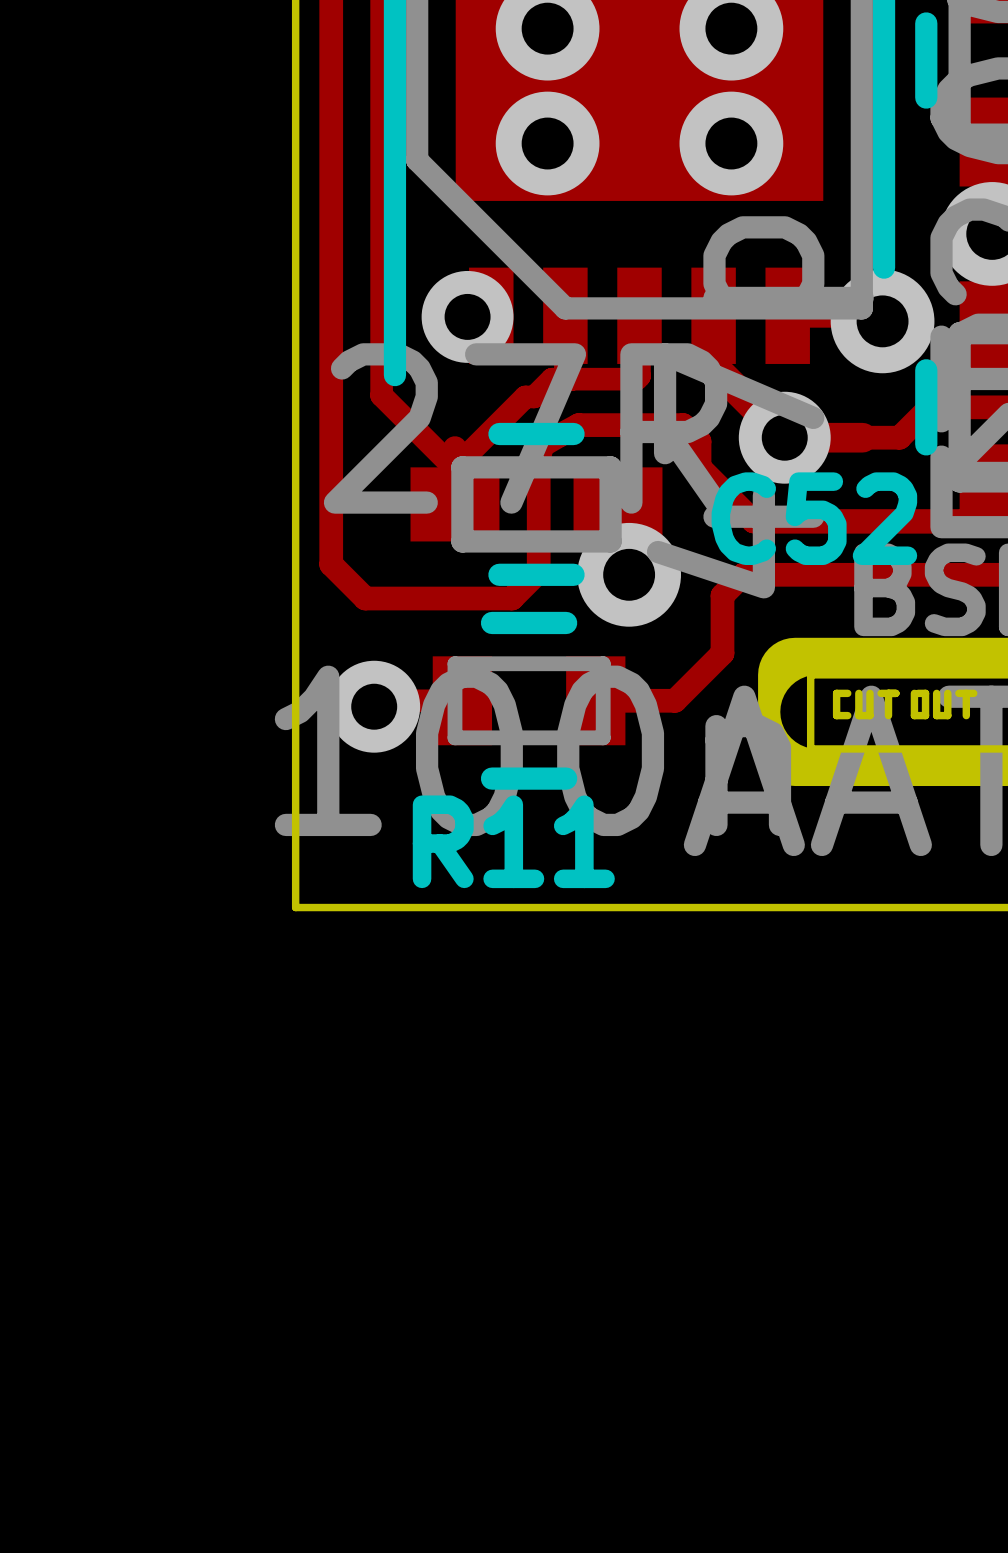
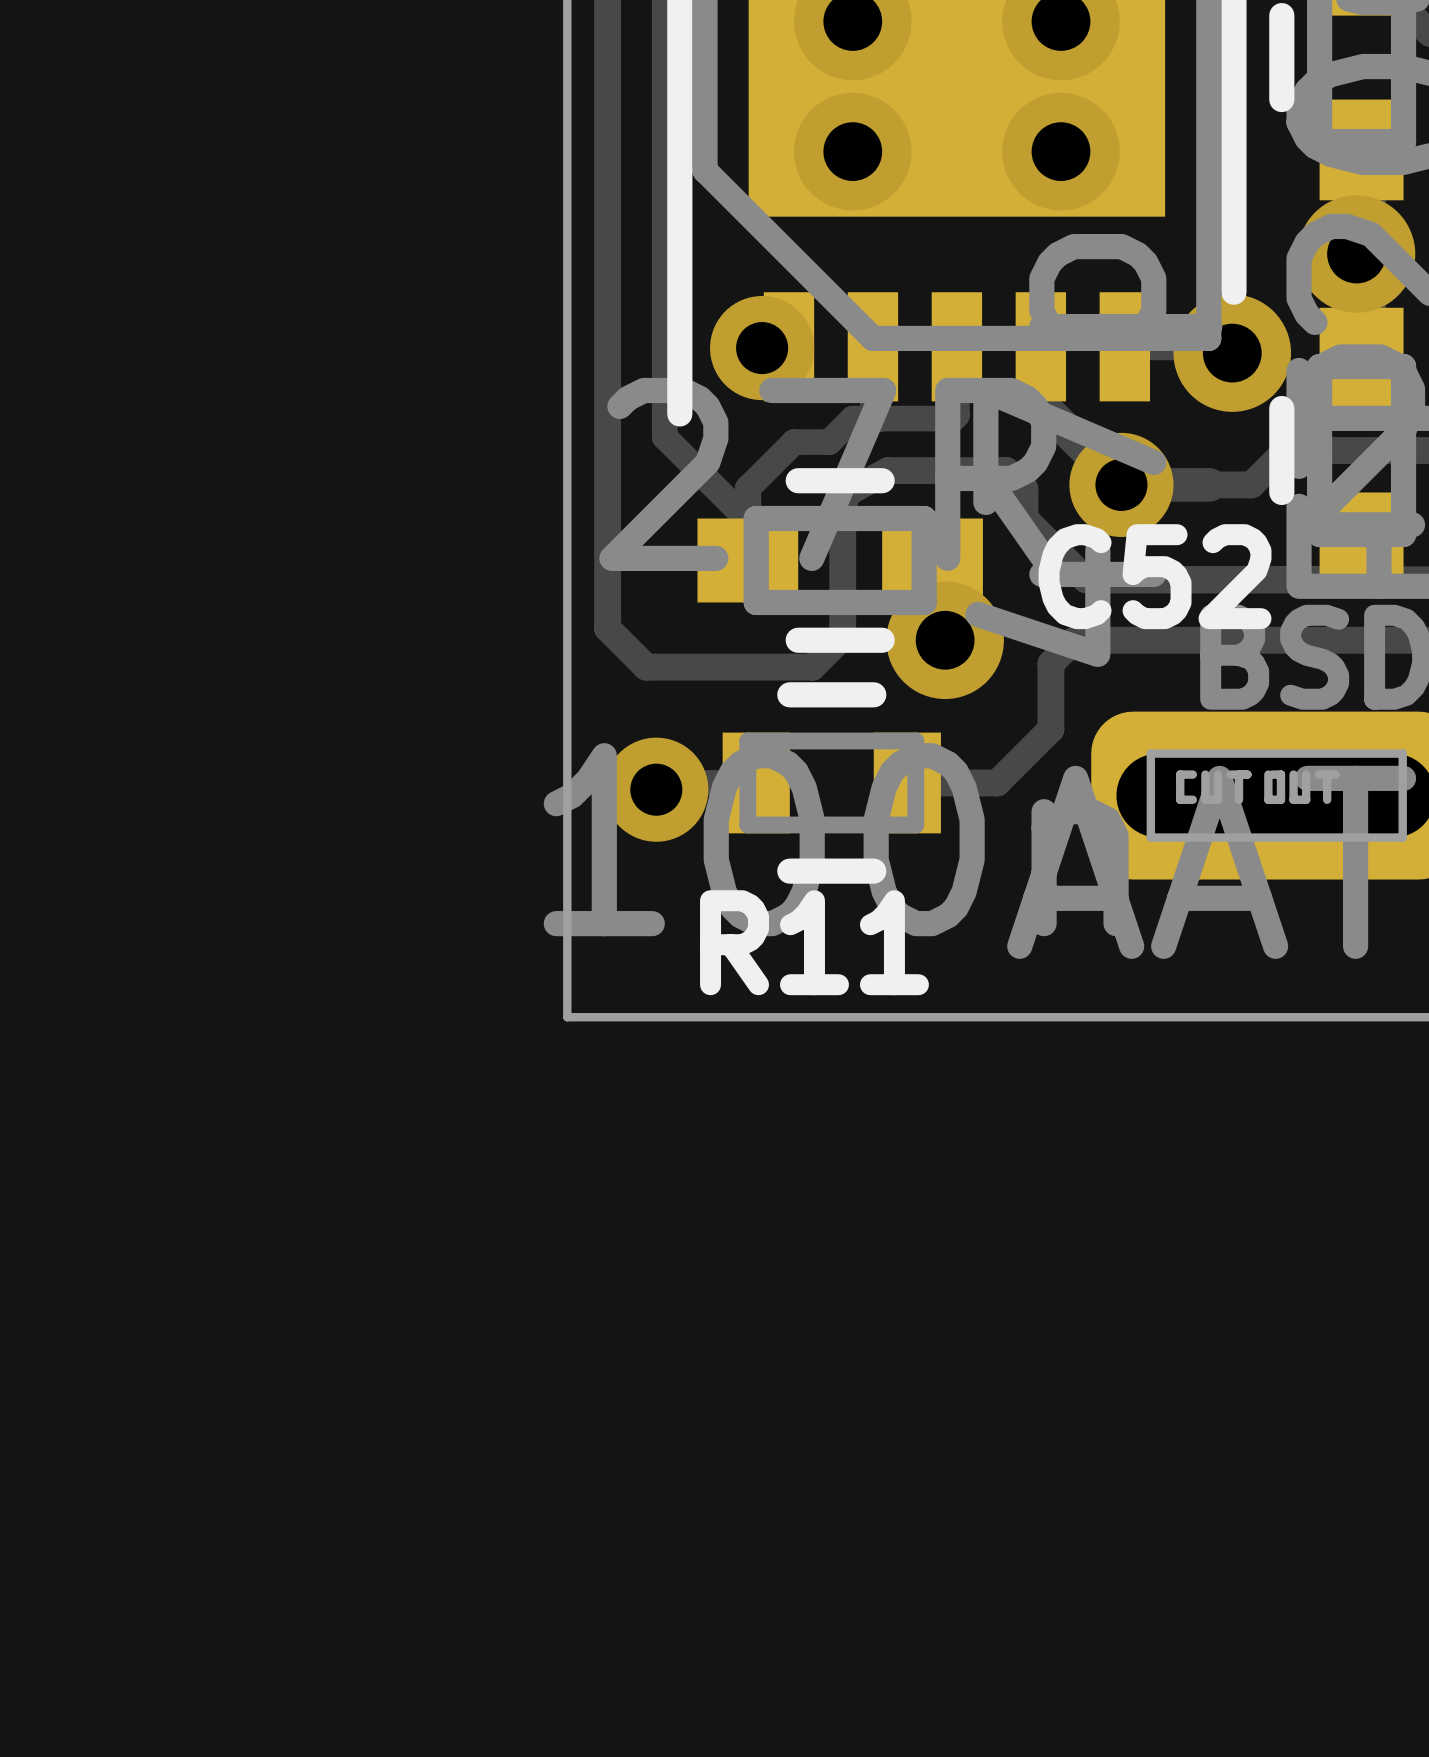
track: (552, 379) (534, 396) (525, 396) (454, 467) -> (857, 418) (852, 418) (829, 442) (794, 442) (747, 488) (747, 518)

